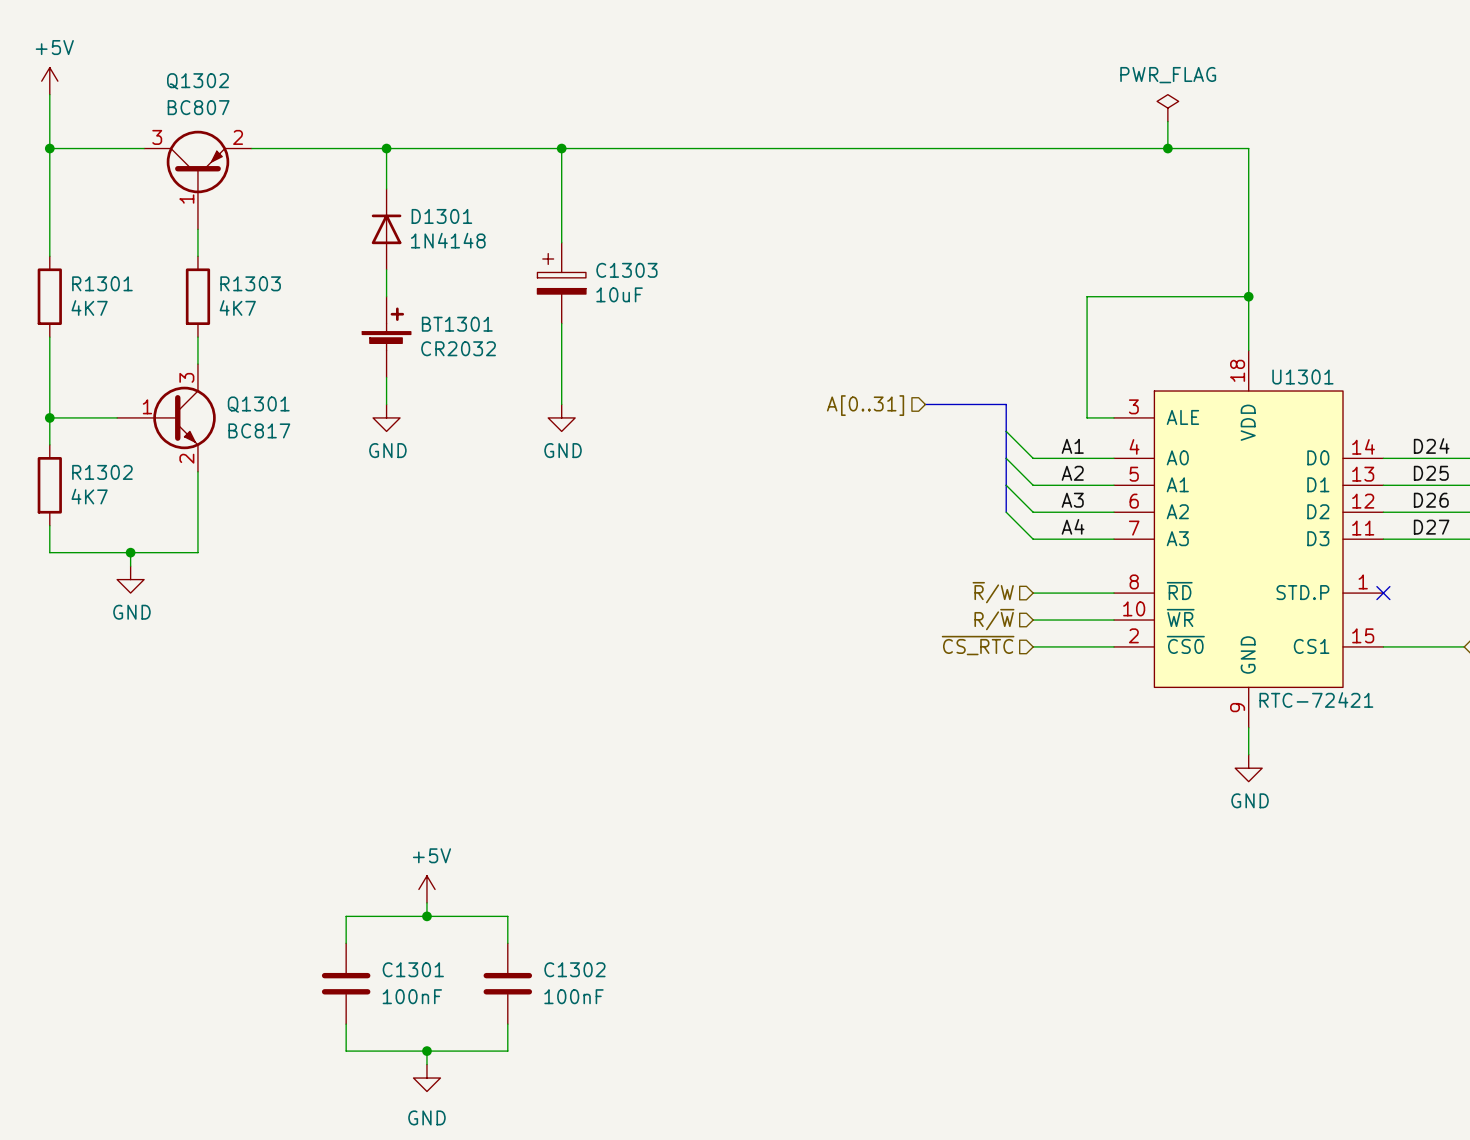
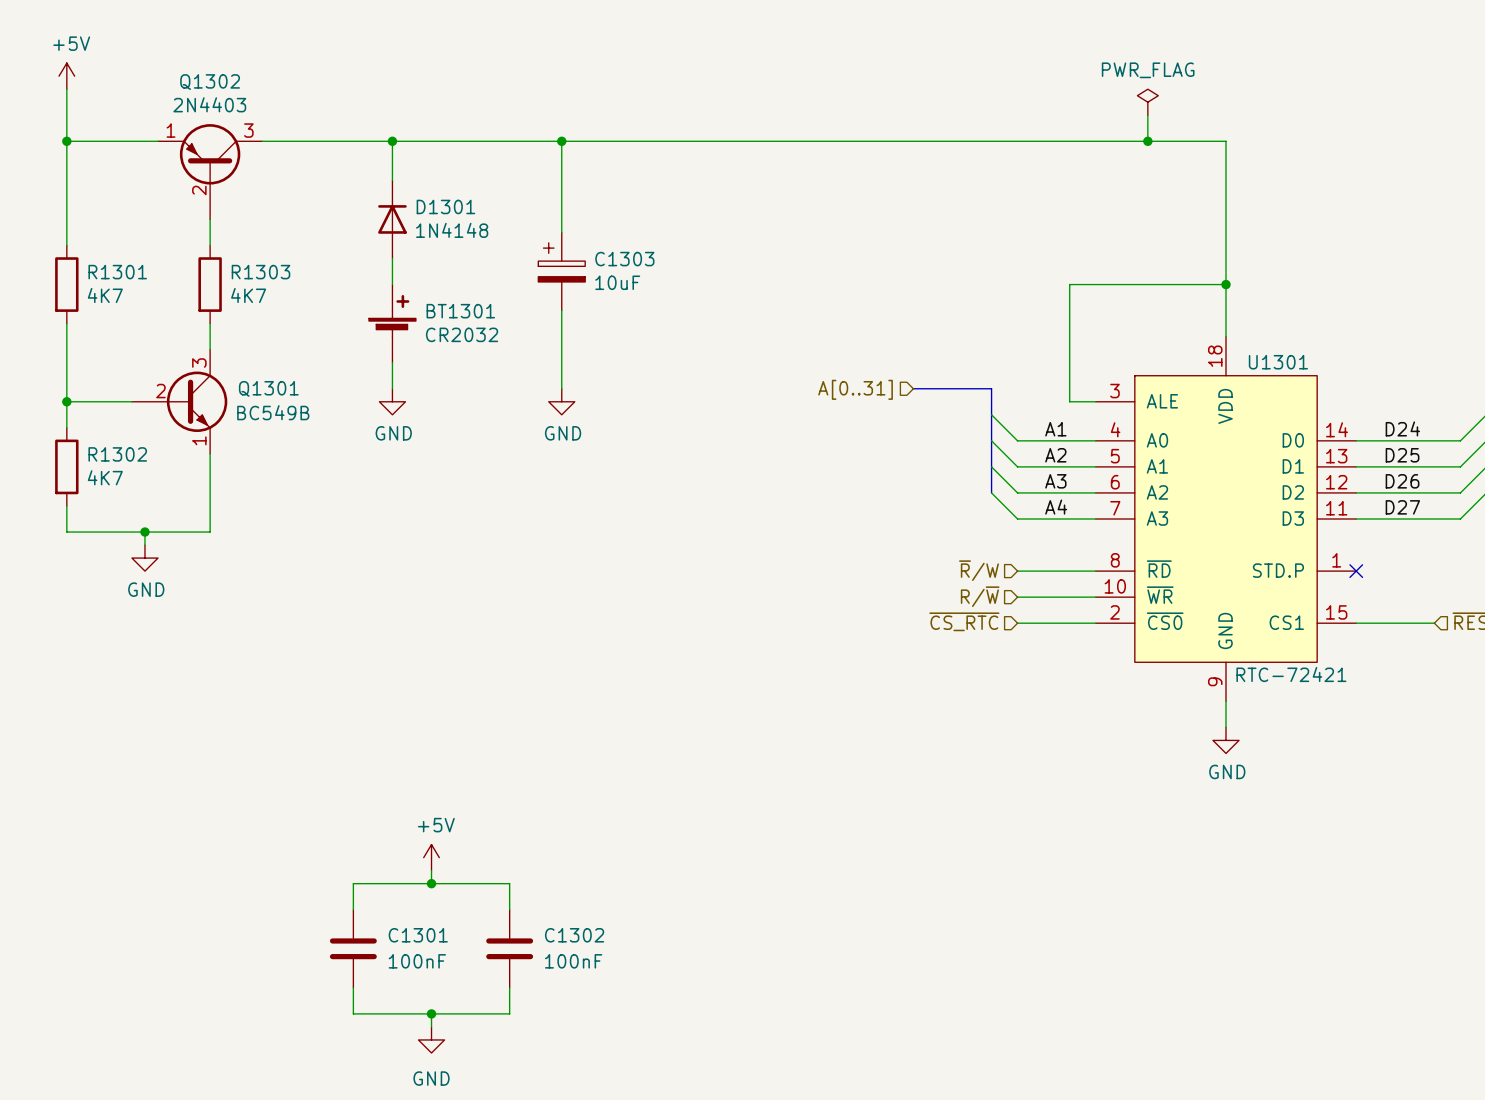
Q1302 value: BC807 (198, 107) -> 2N4403 (209, 104)
Q1302 symbol: [144, 130, 252, 230] -> [158, 124, 263, 220]
Q1301 pin number: 1 (147, 406) -> 2 (160, 391)
Q1301 value: BC817 (259, 430) -> BC549B (273, 412)
Q1301 pin number: 2 (186, 458) -> 1 (199, 440)

